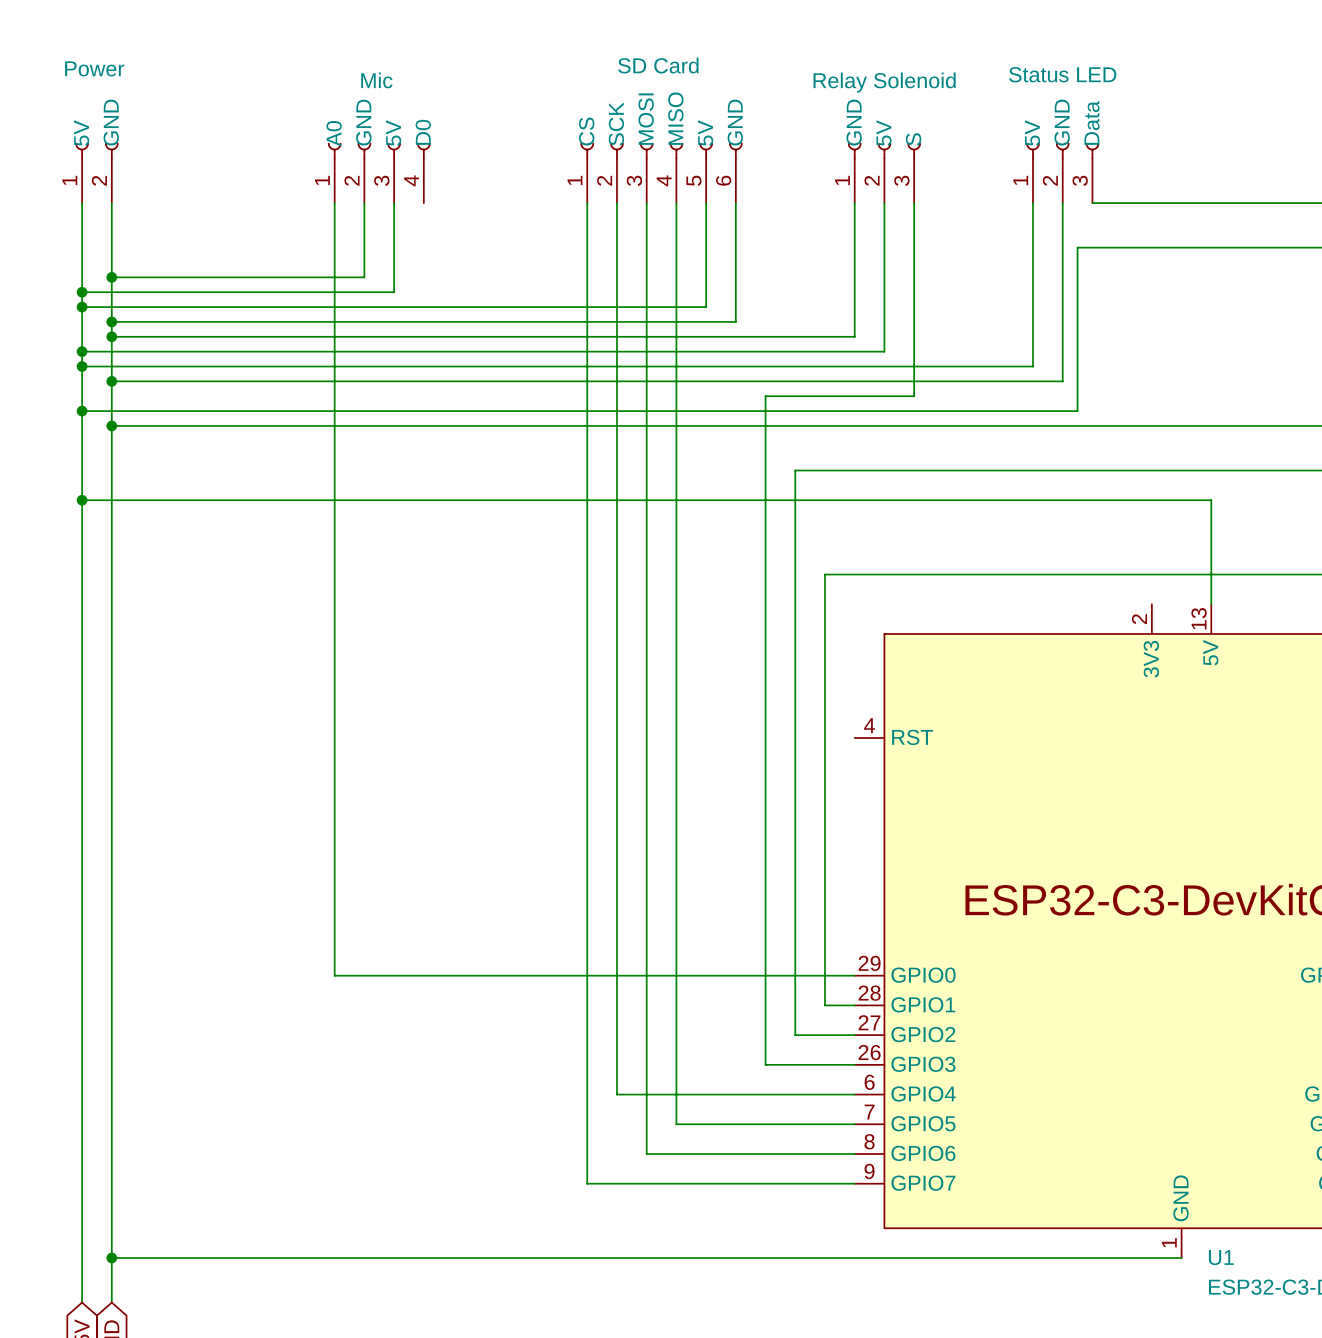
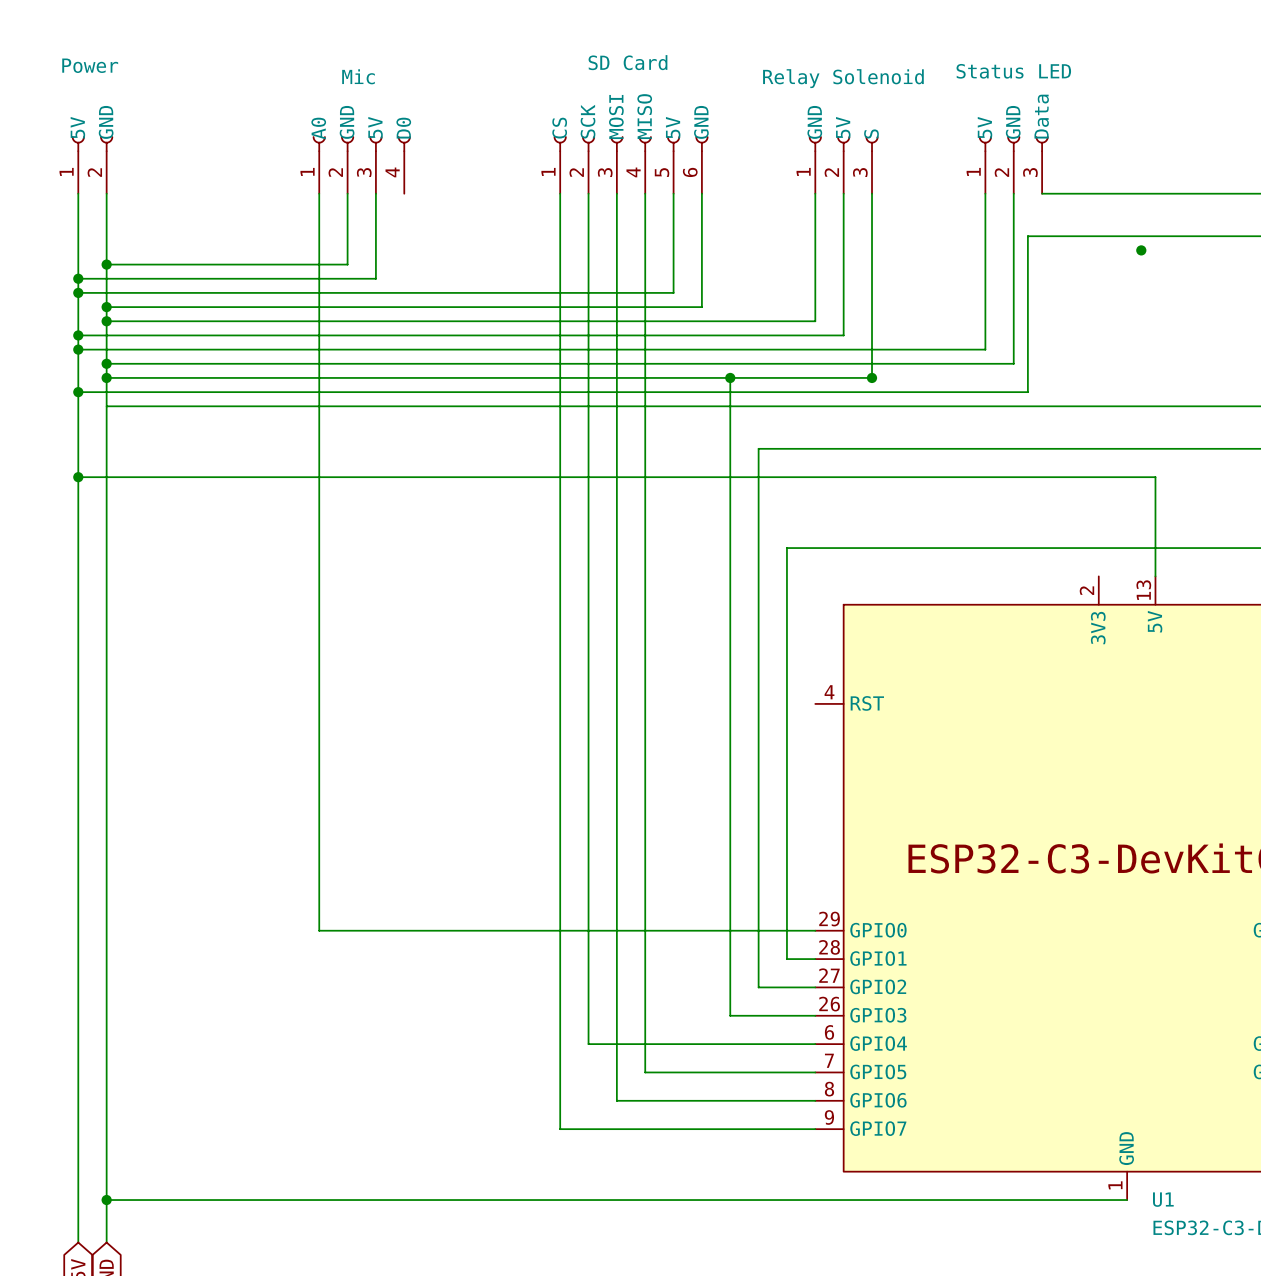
junction: none -> (1141, 250)
wire: none -> (106, 377) (730, 377)
junction: none -> (730, 377)
junction: none -> (872, 377)
junction position: (111, 425) -> (106, 377)

